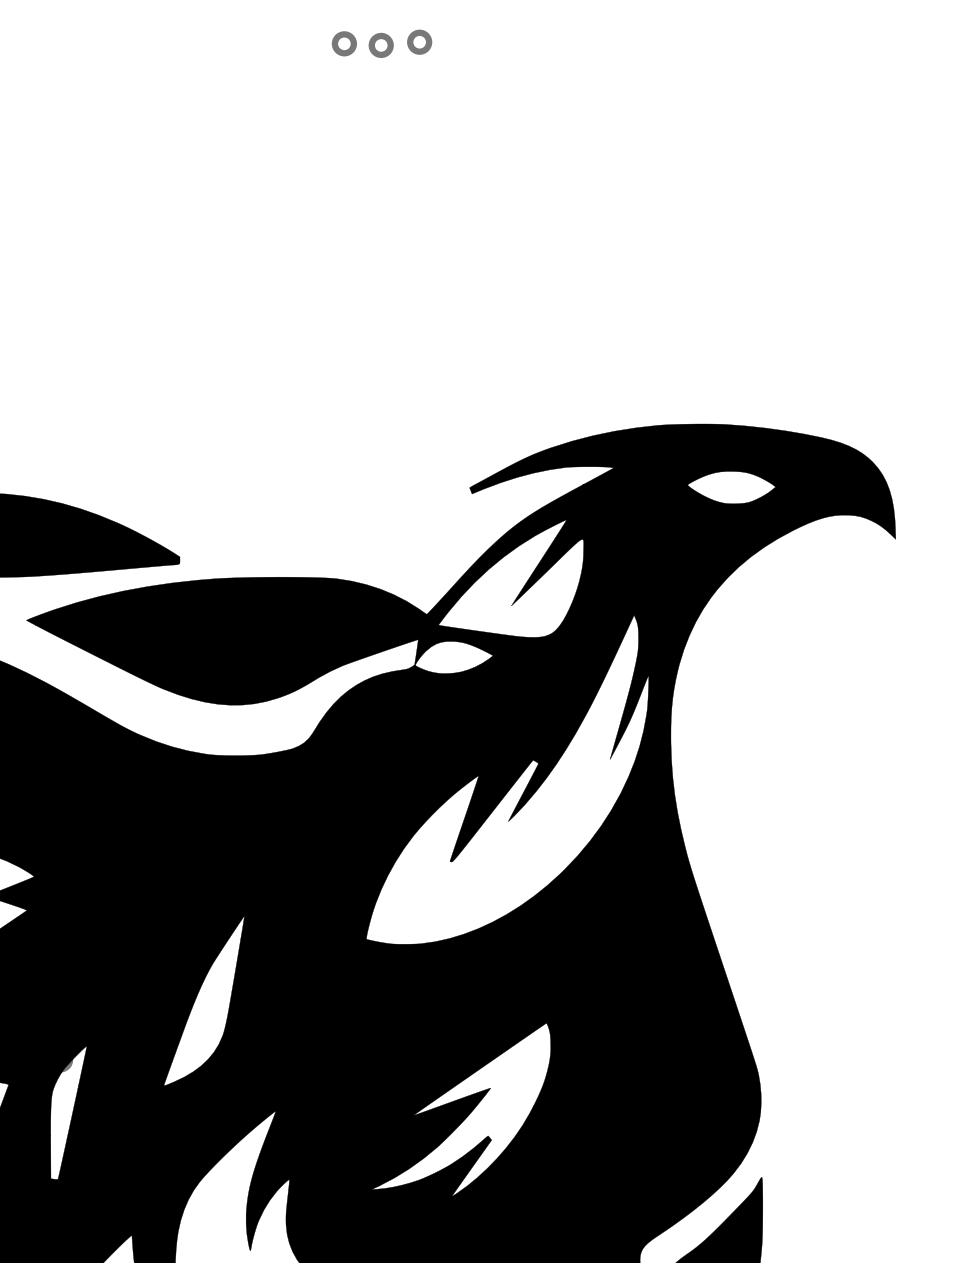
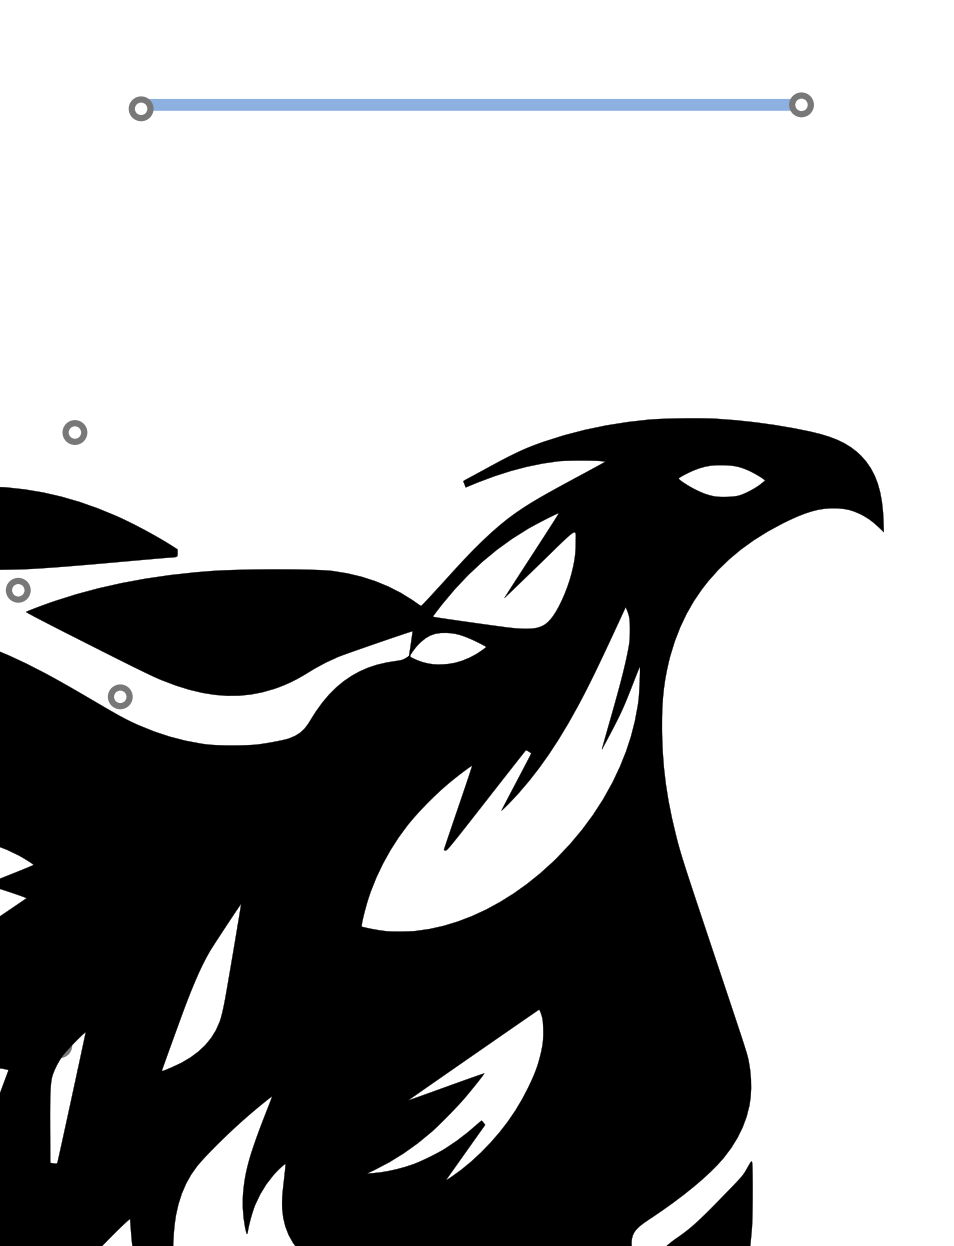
via: (419, 42) -> none
via: (344, 43) -> none
via: (381, 45) -> none
track: none -> (801, 104) (145, 104) (141, 108)
via: none -> (801, 104)
via: none -> (141, 108)
via: none -> (74, 432)
via: none -> (18, 590)
via: none -> (120, 696)

